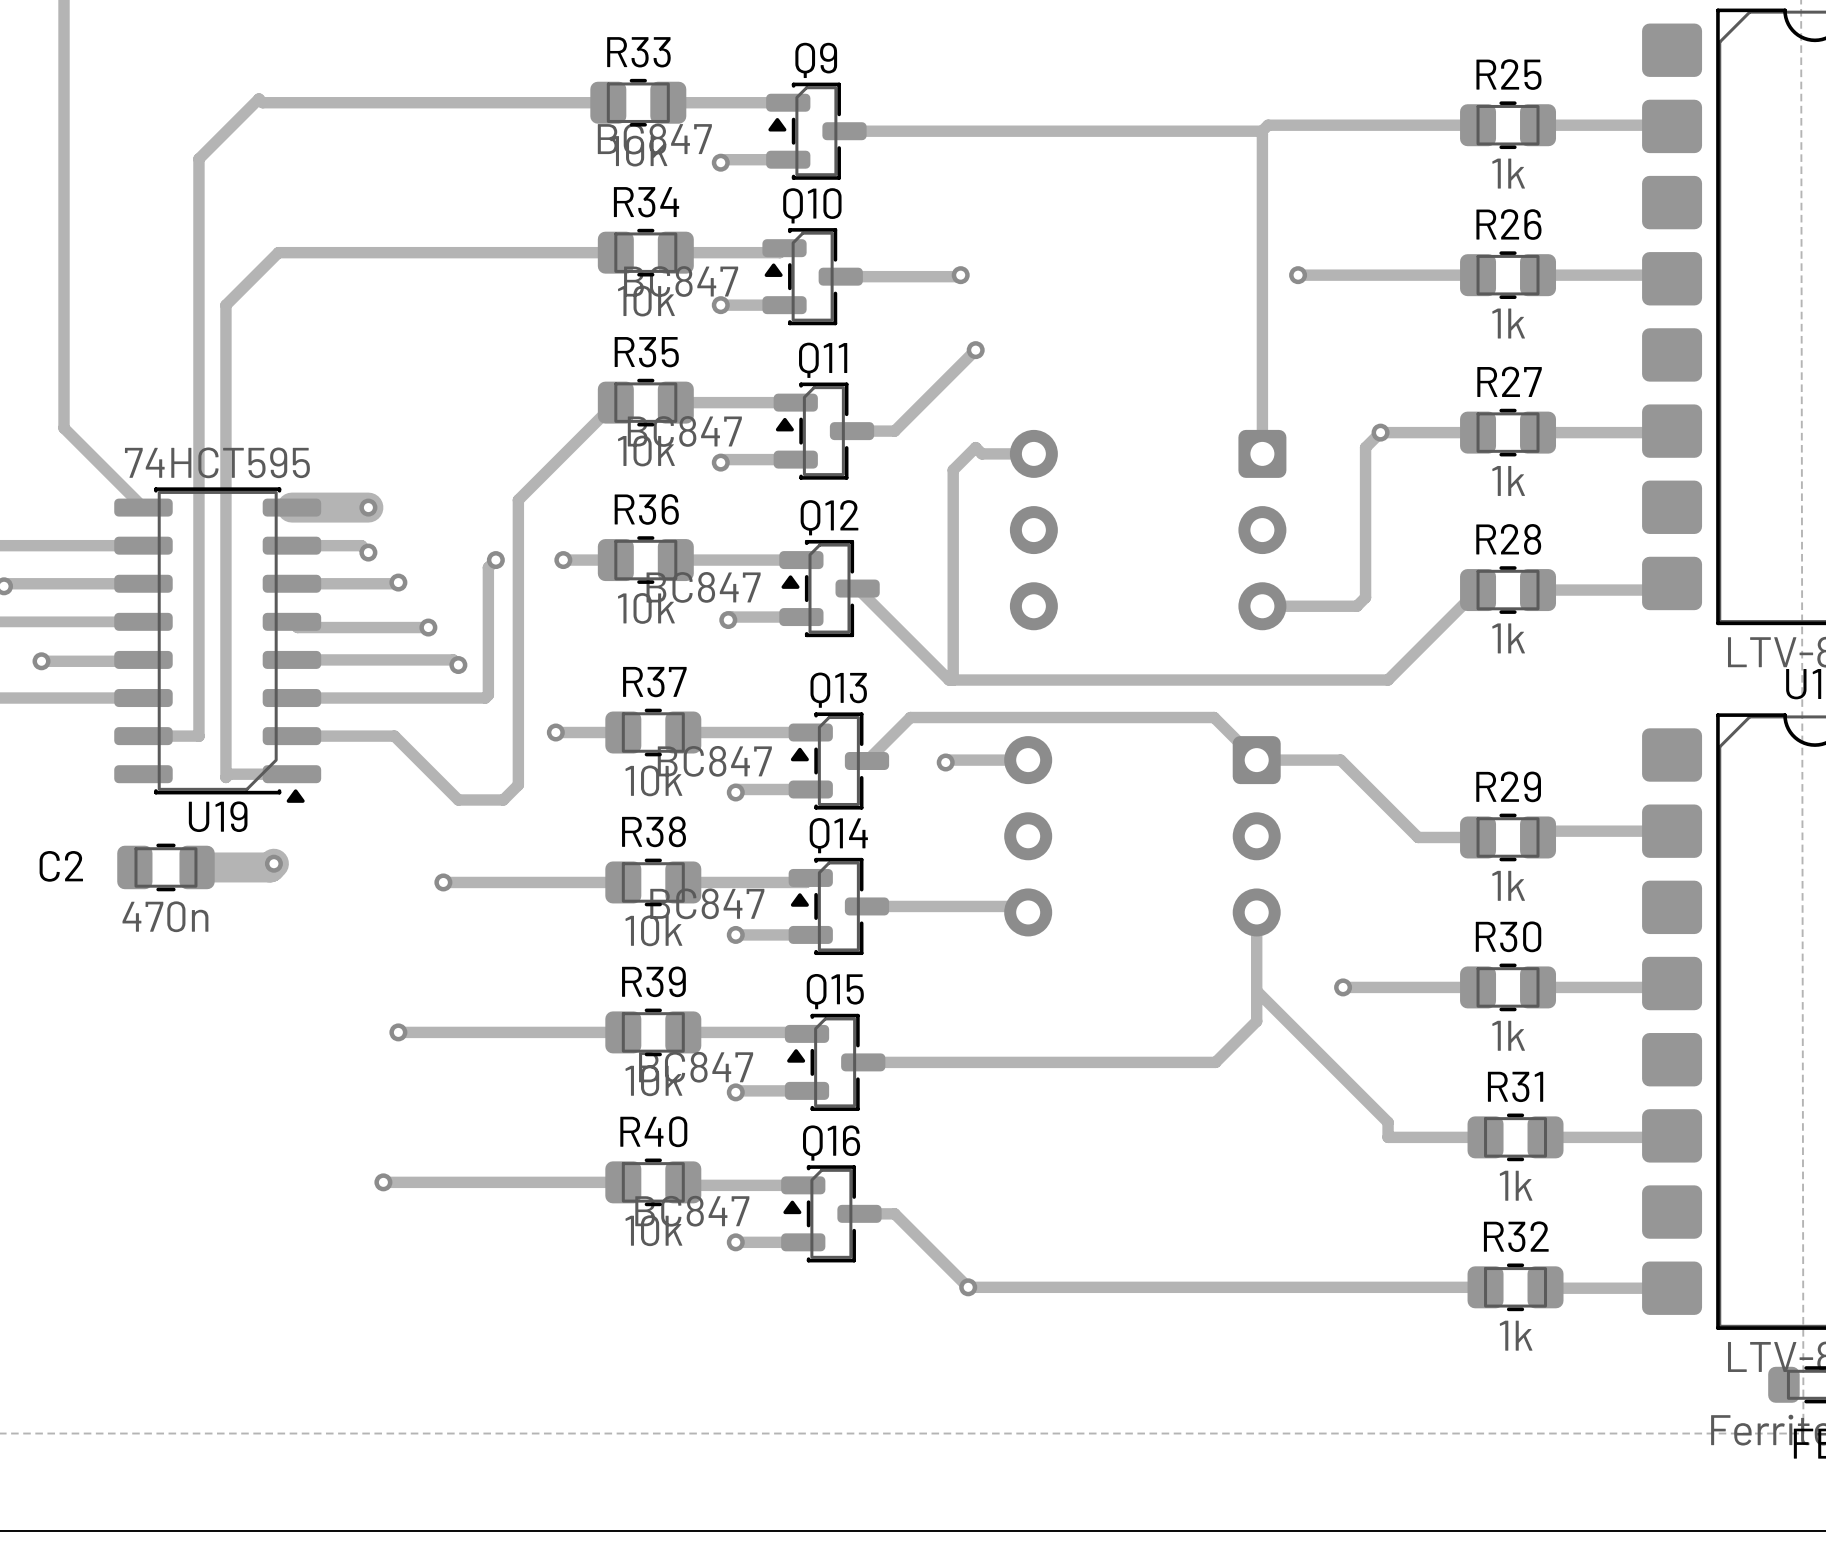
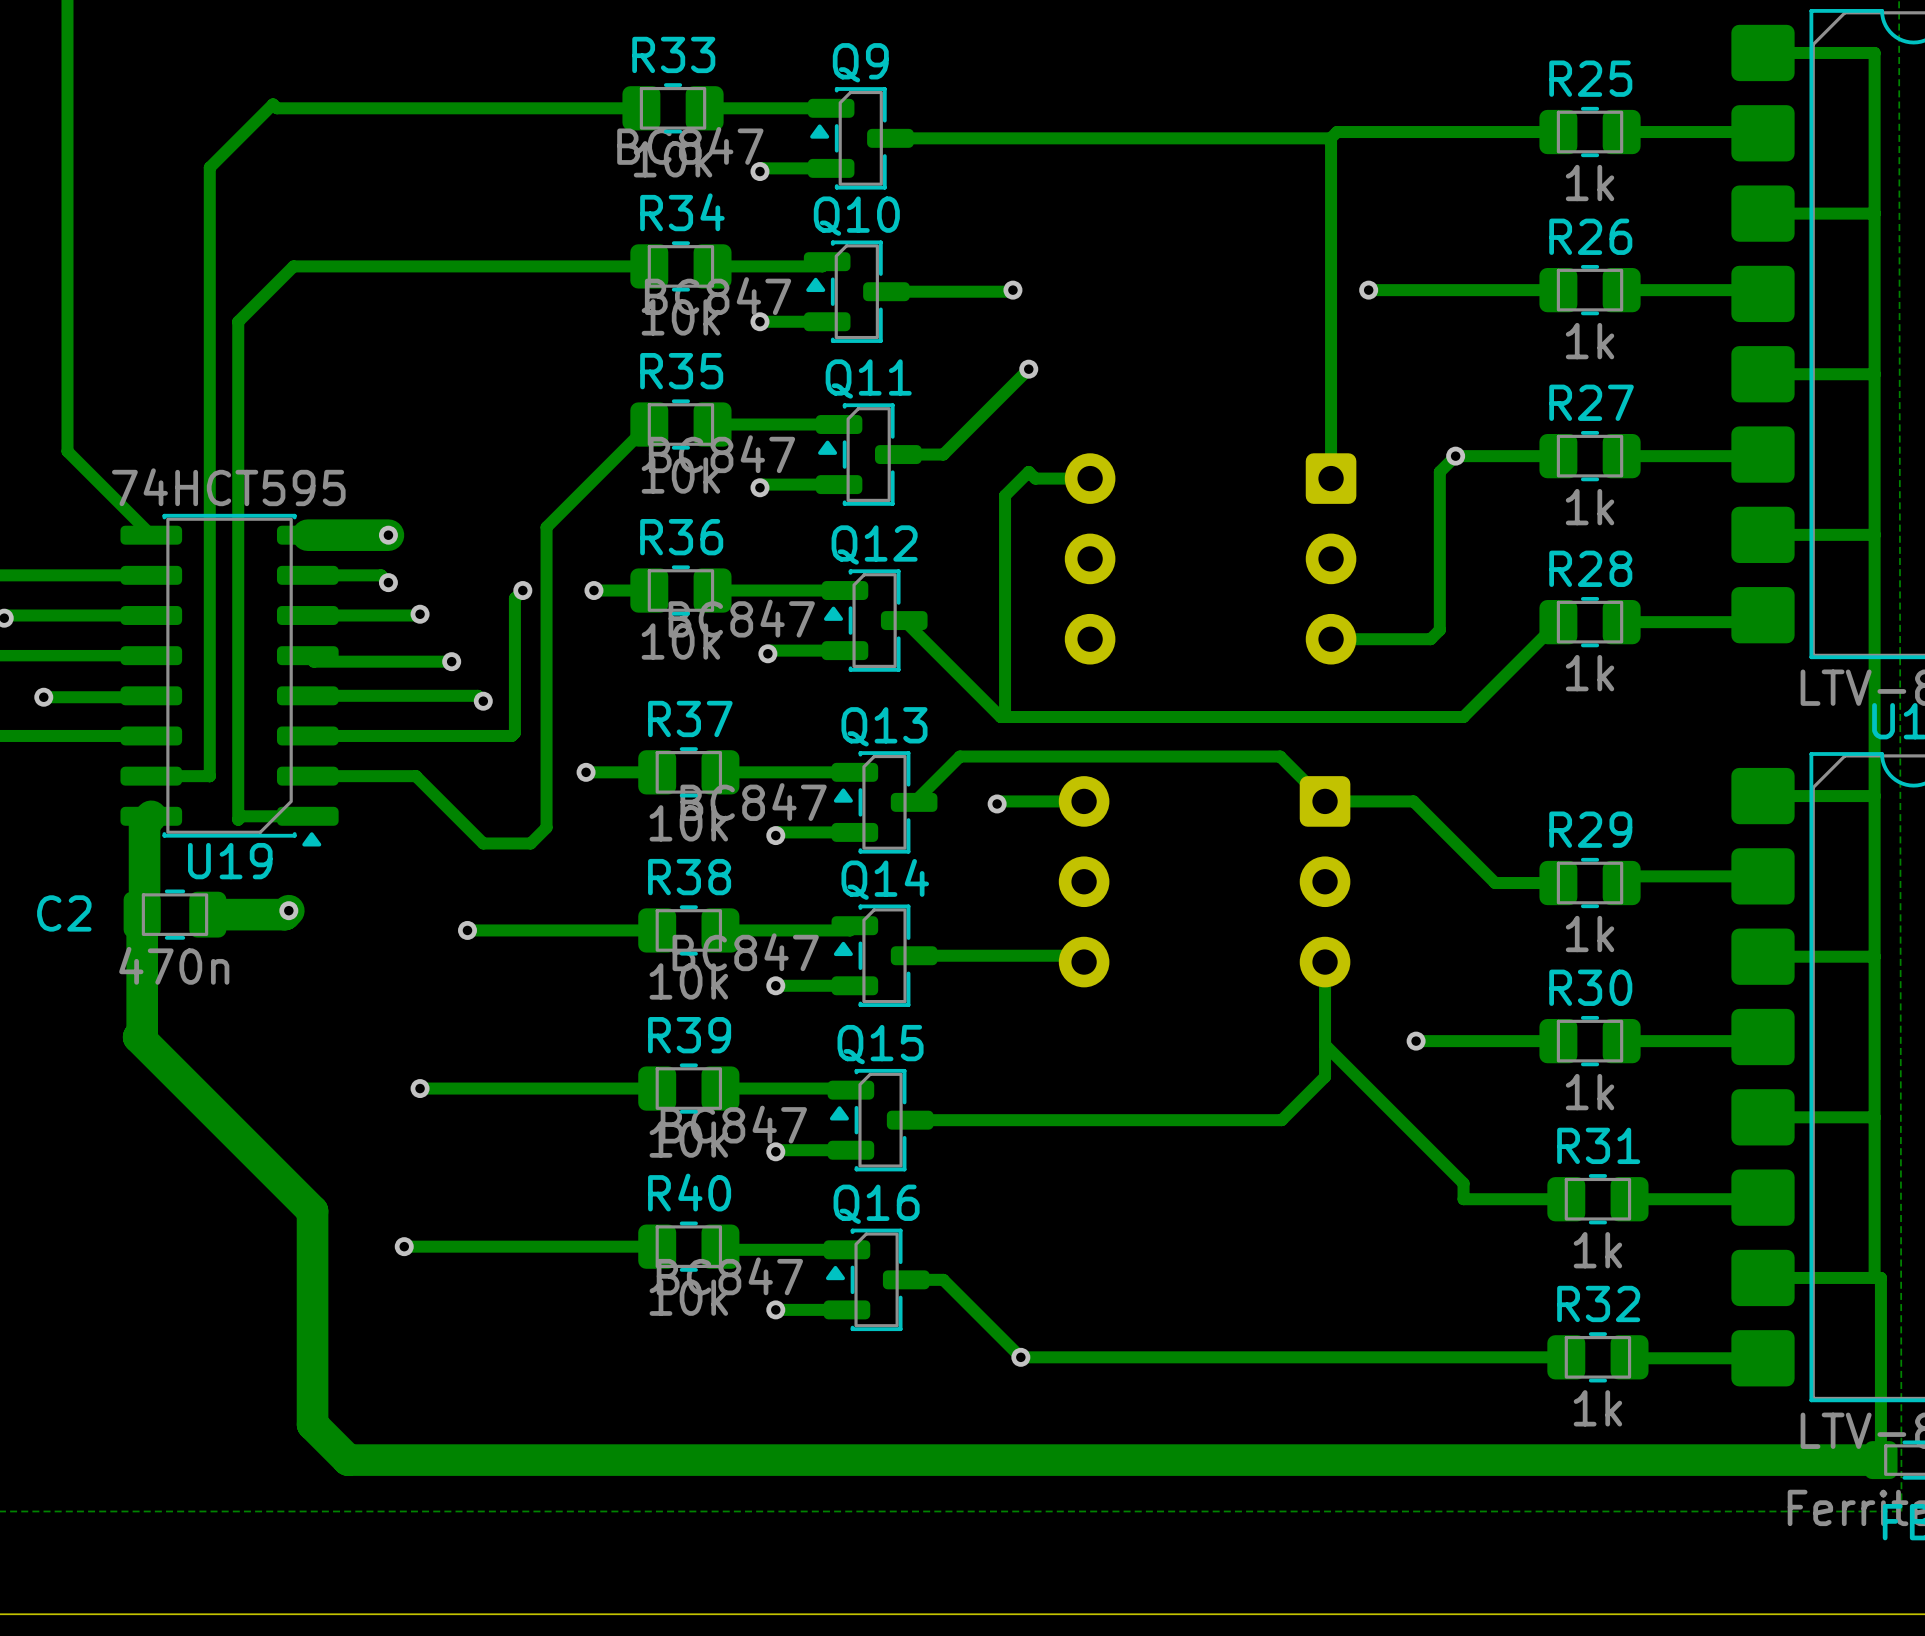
track: none -> (1762, 52) (1874, 52) (1874, 1277)
track: none -> (1874, 213) (1762, 213)
track: none -> (1874, 374) (1762, 374)
track: none -> (1874, 534) (1762, 534)
track: none -> (1874, 796) (1762, 796)
track: none -> (151, 816) (144, 823) (144, 890)
track: none -> (142, 914) (142, 1033) (138, 1037) (312, 1211) (312, 1424) (348, 1460) (1880, 1460) (1880, 1277) (1762, 1277)
track: none -> (1874, 956) (1762, 956)
track: none -> (1874, 1117) (1762, 1117)

